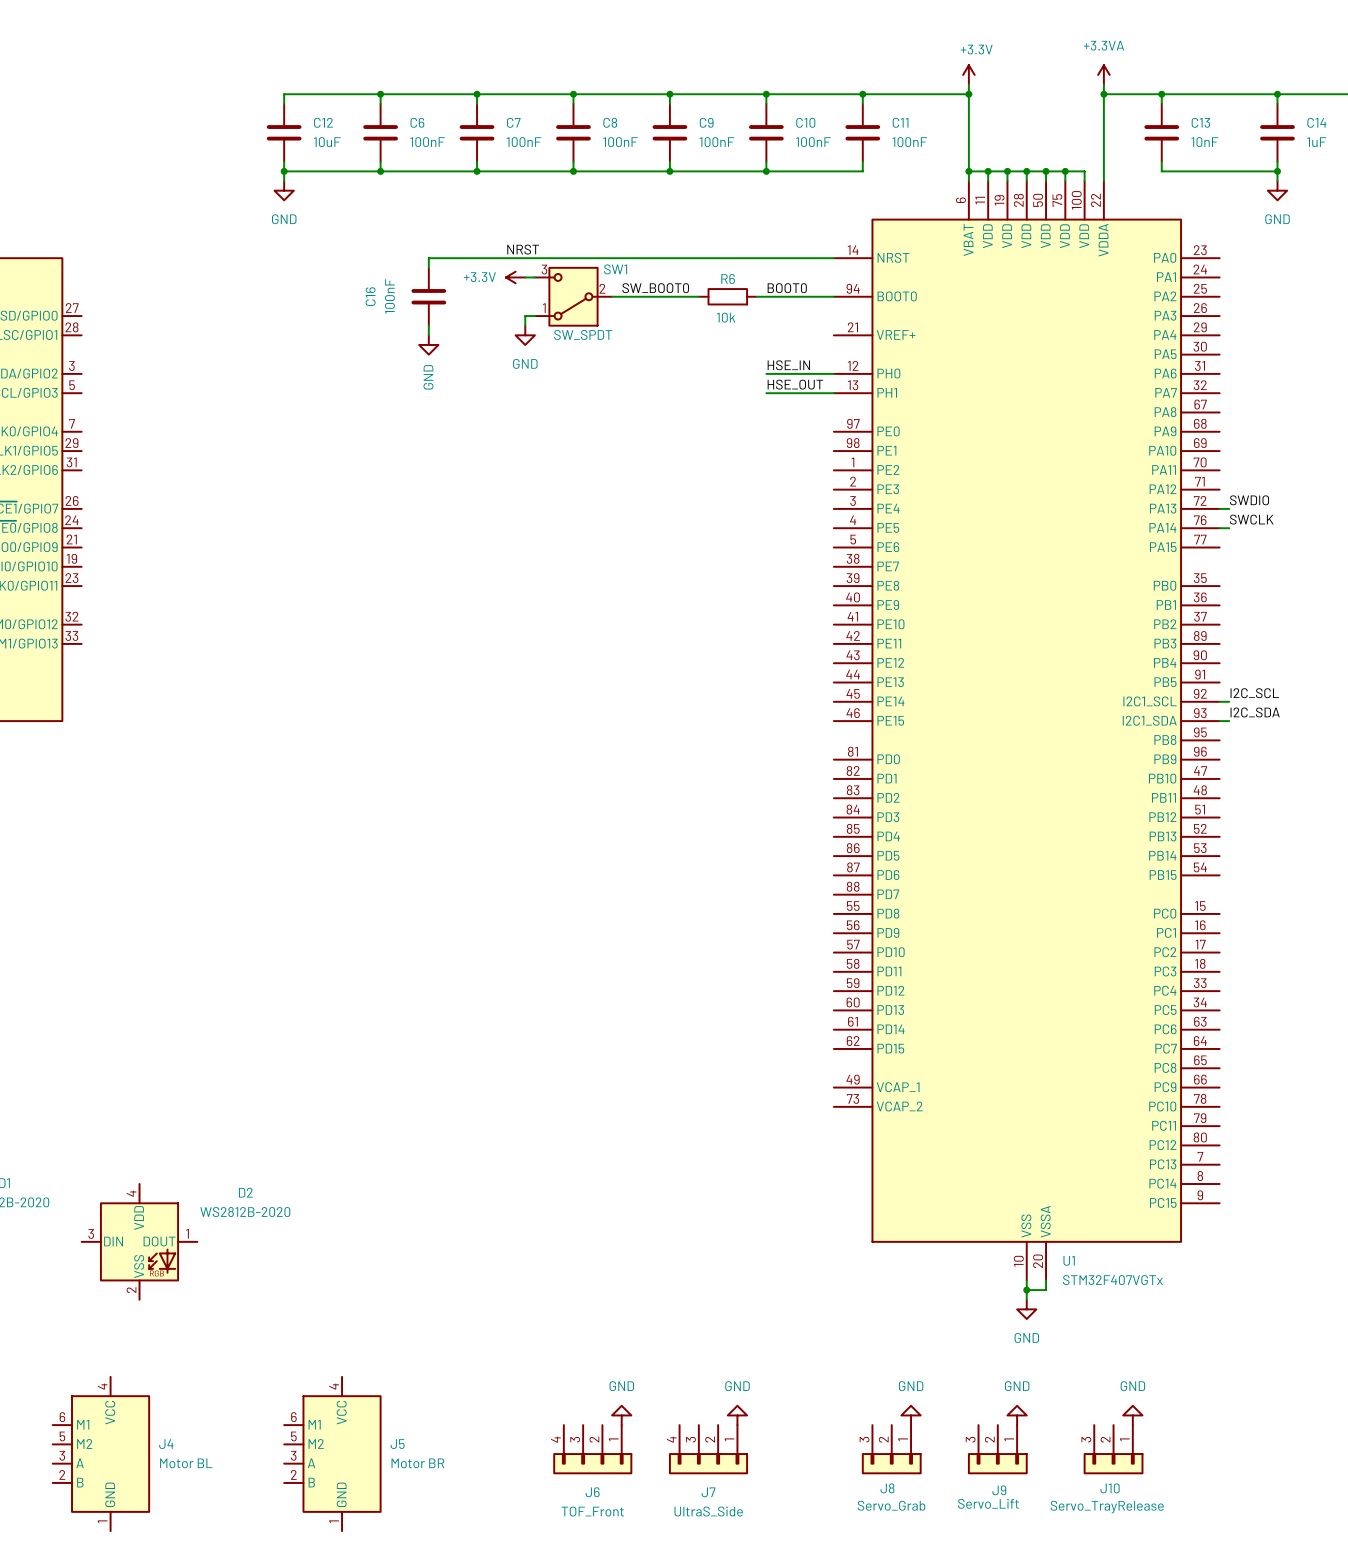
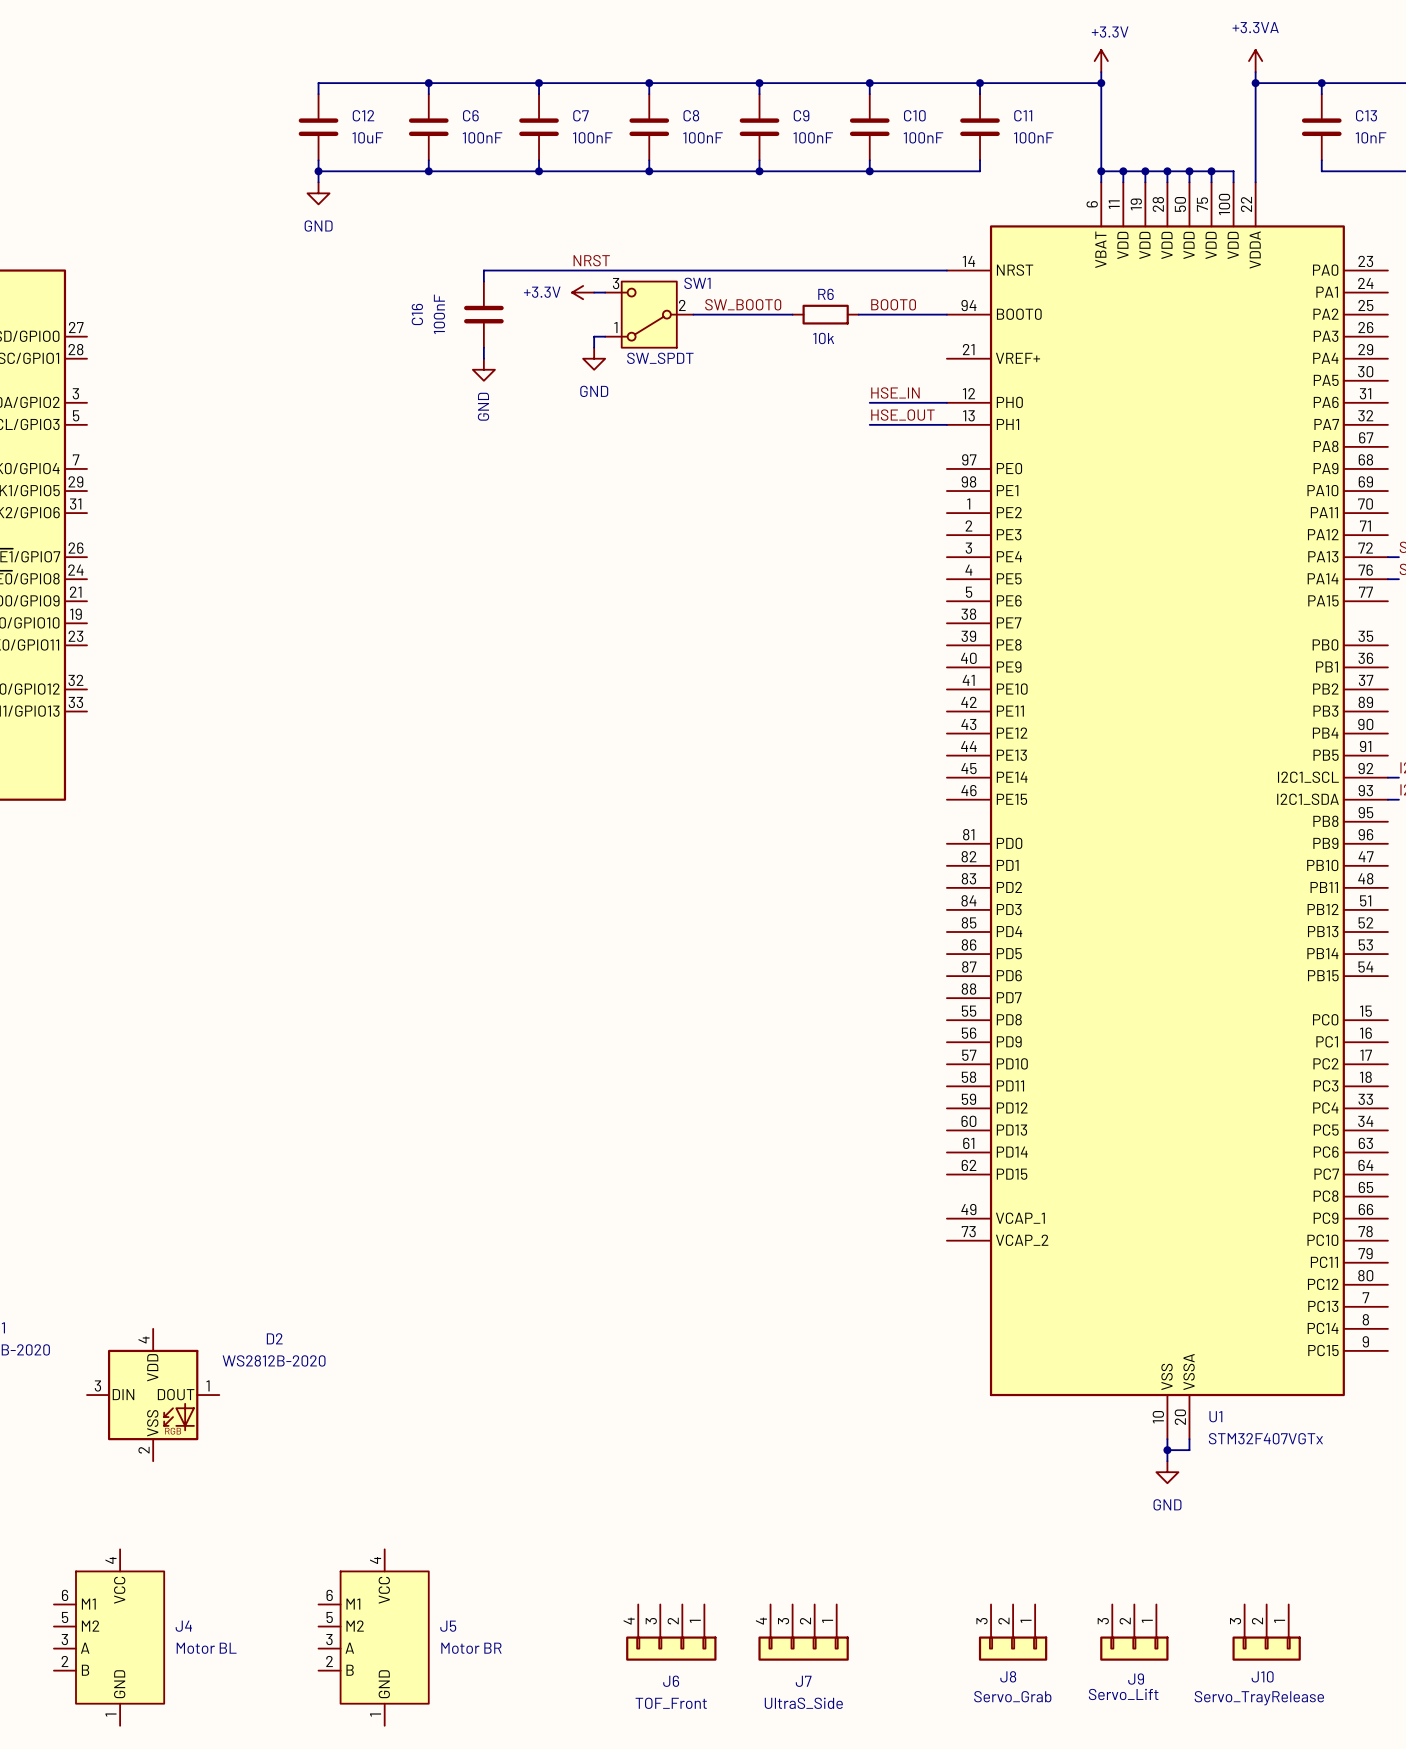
power symbol: GND (621, 1415) -> none
power symbol: GND (737, 1415) -> none
power symbol: GND (911, 1415) -> none
power symbol: GND (1017, 1415) -> none
power symbol: GND (1132, 1415) -> none

